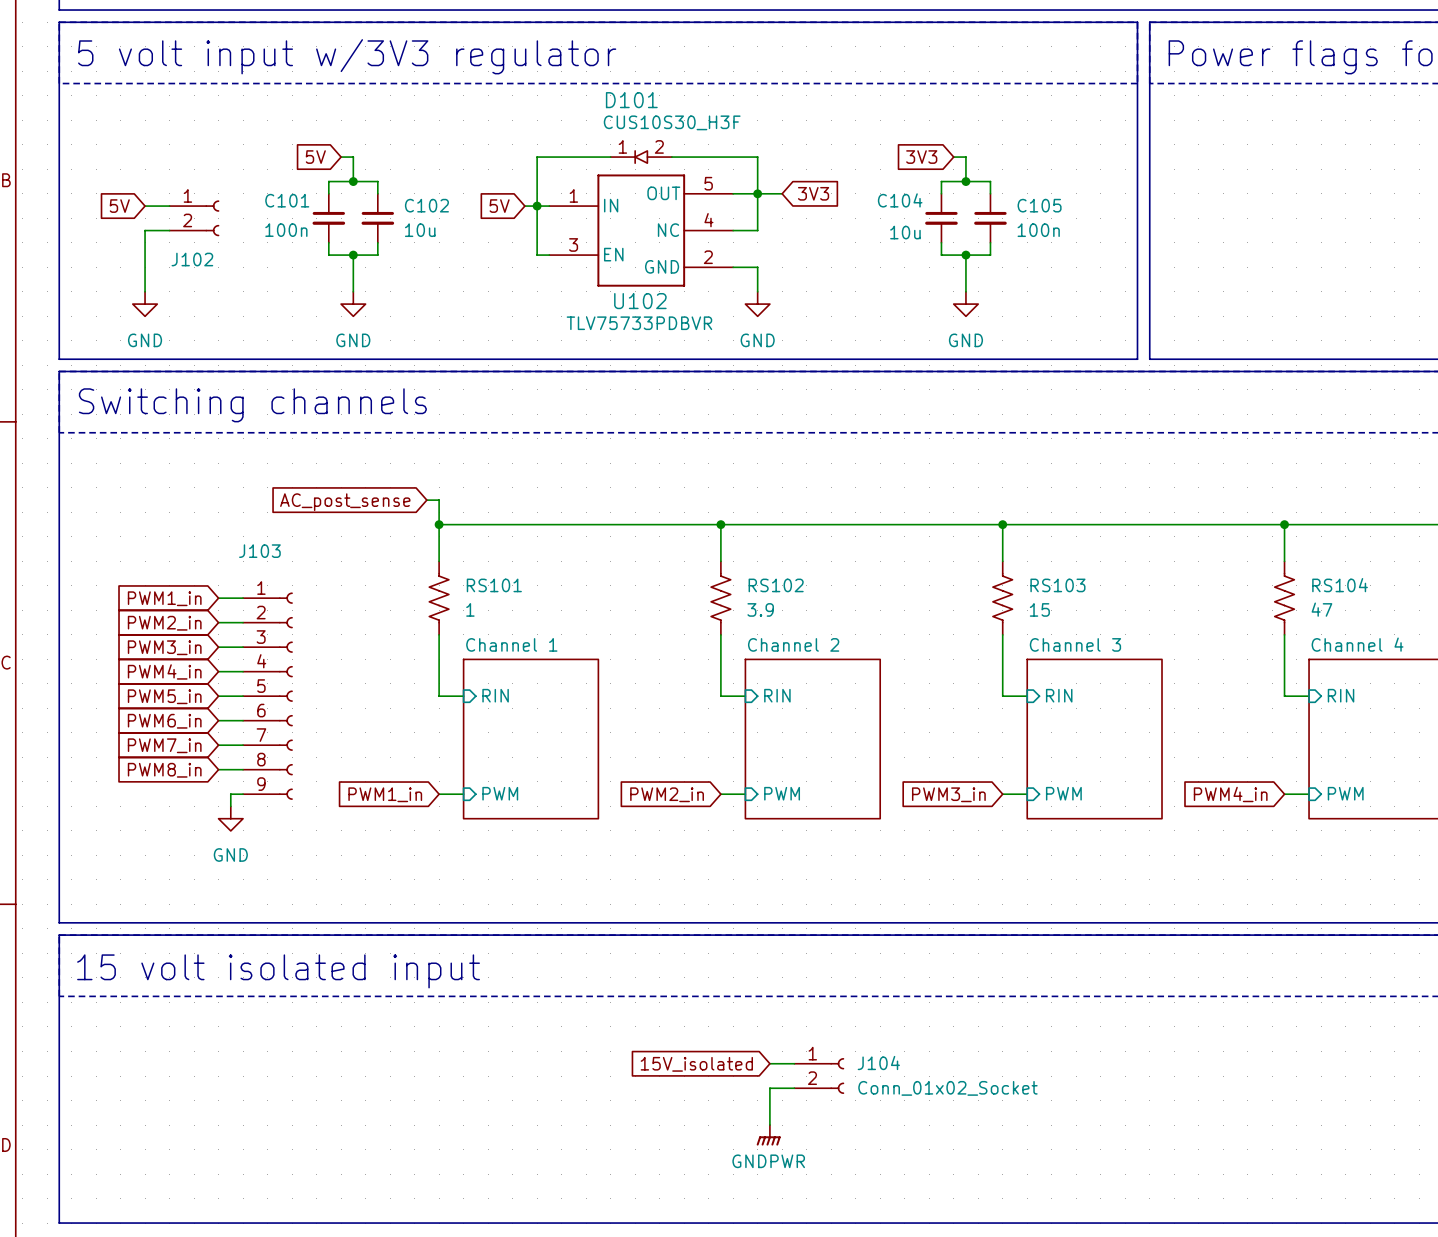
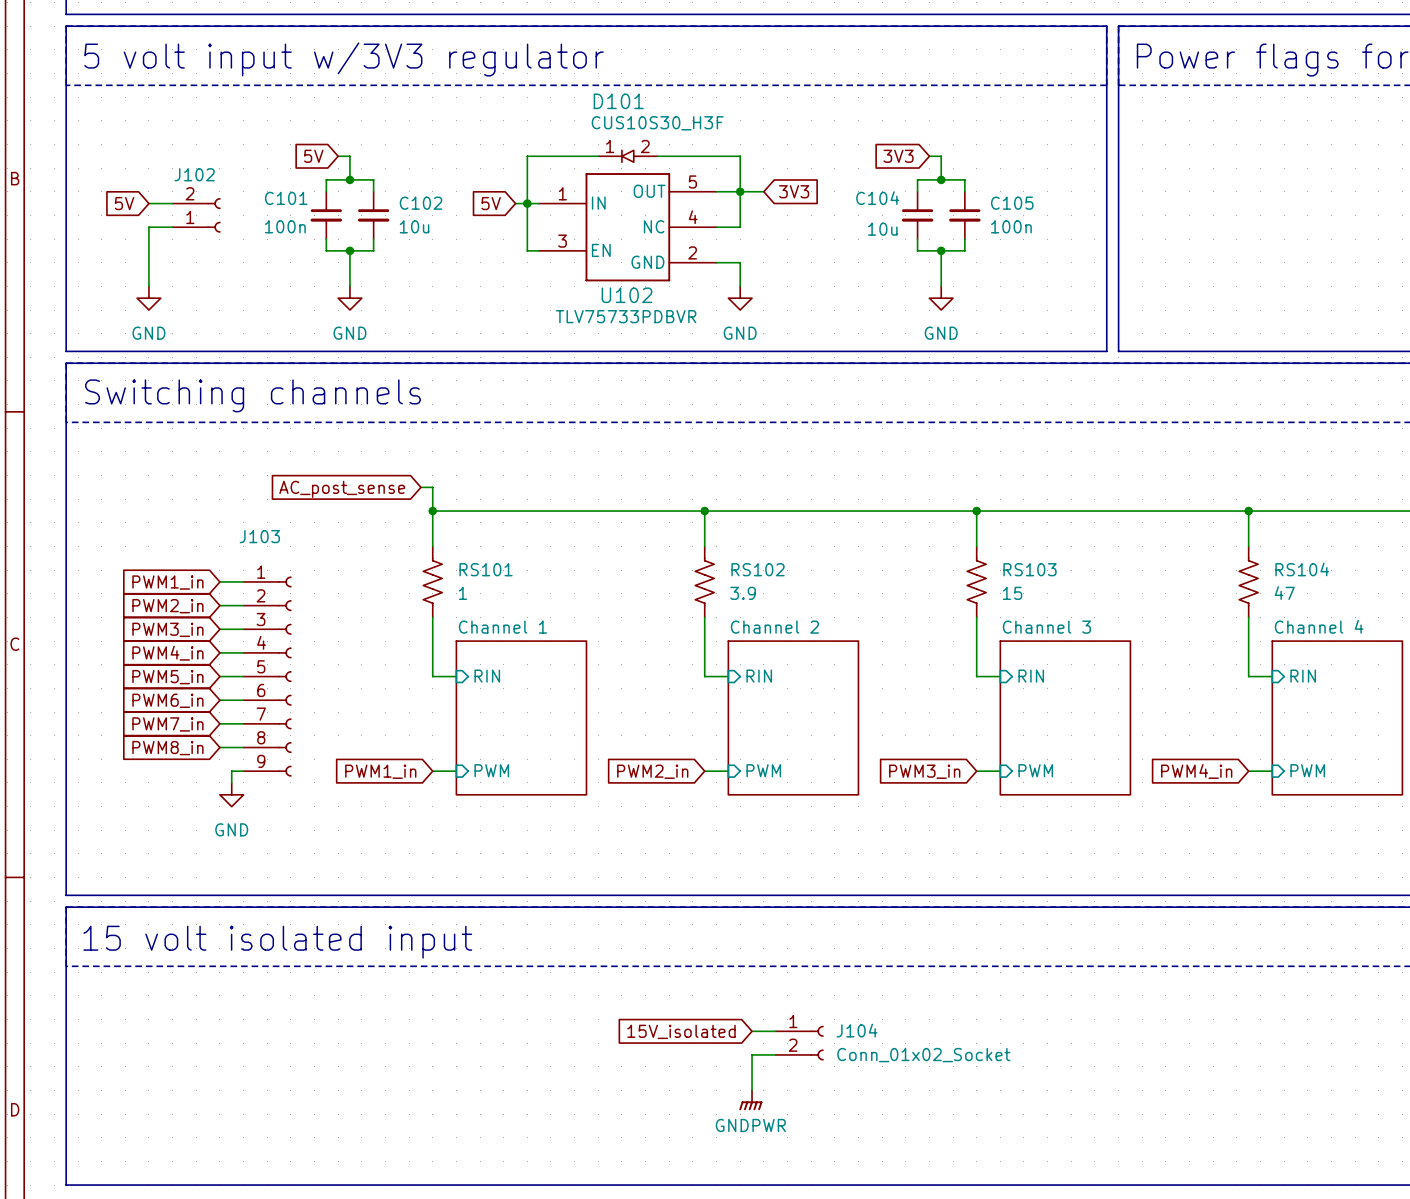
J102 flip: as is (212, 218) -> up-down (213, 215)

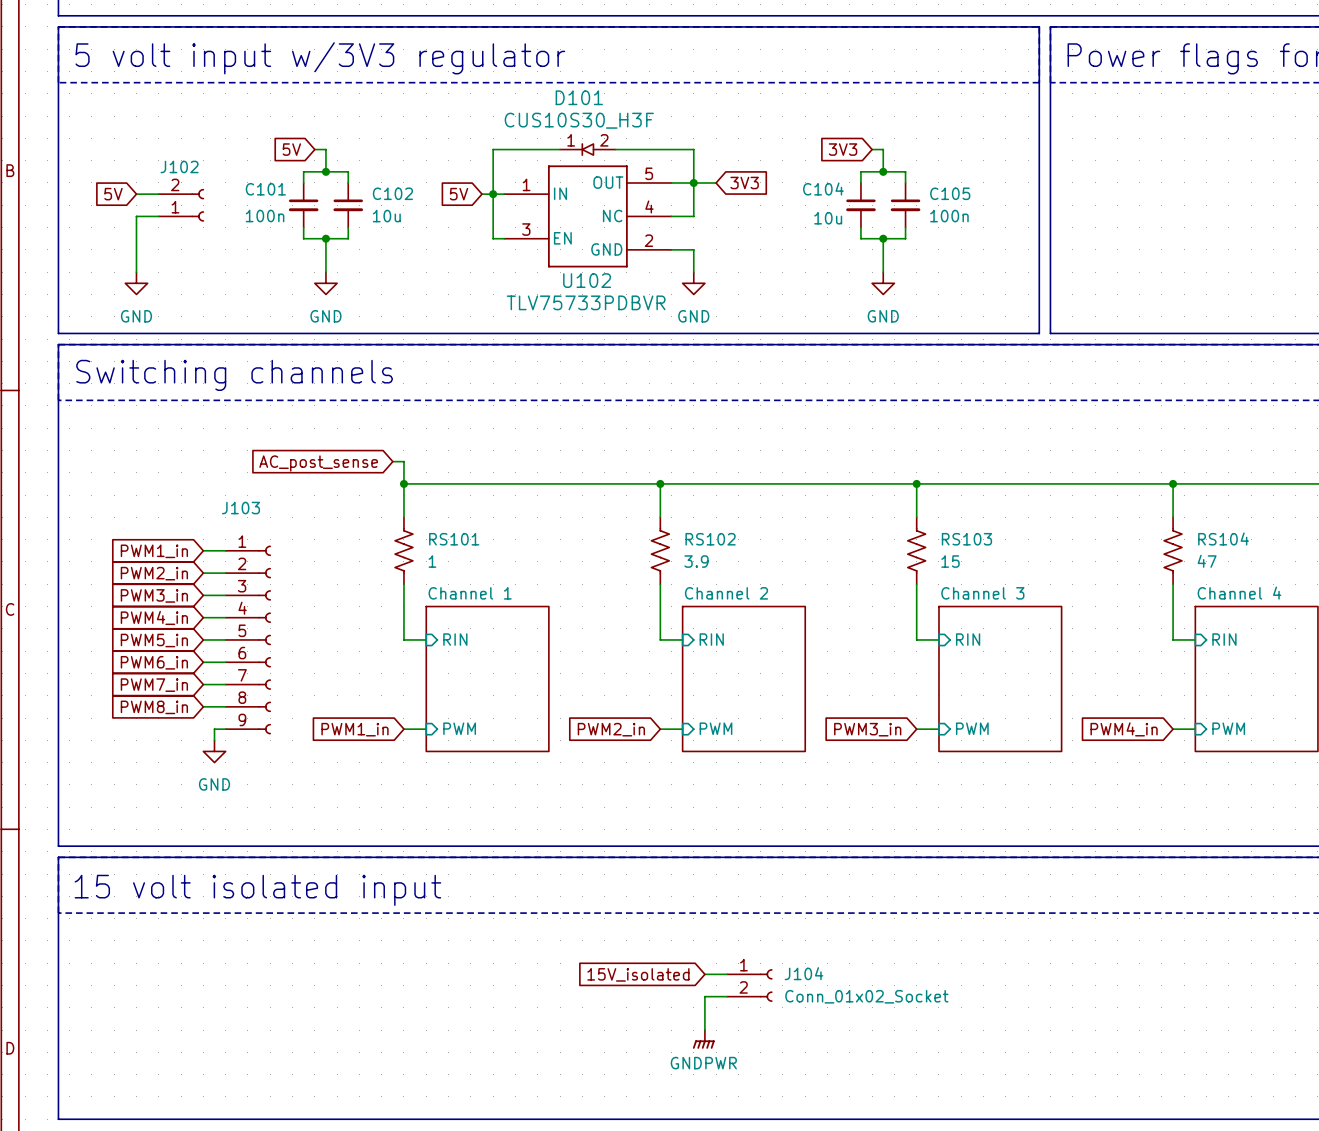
D101 text: CUS10S30_H3F (657, 123) -> none
D101 value: none -> CUS10S30_H3F (579, 120)
U102 text: TLV75733PDBVR (626, 316) -> none
U102 value: none -> TLV75733PDBVR (586, 302)

